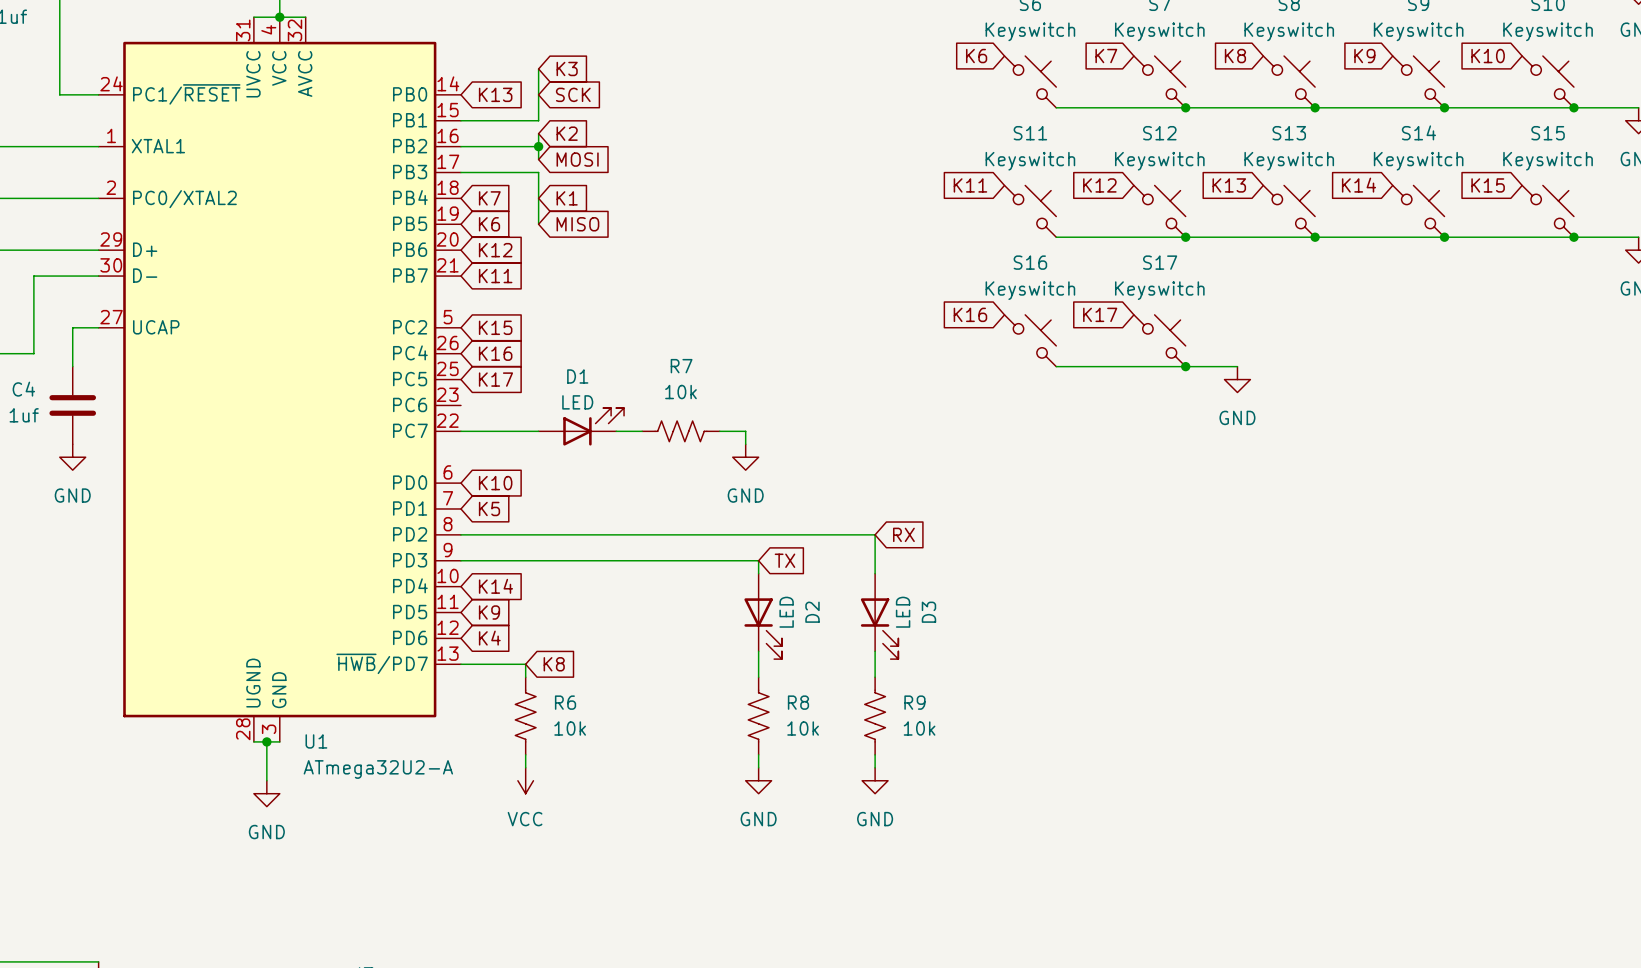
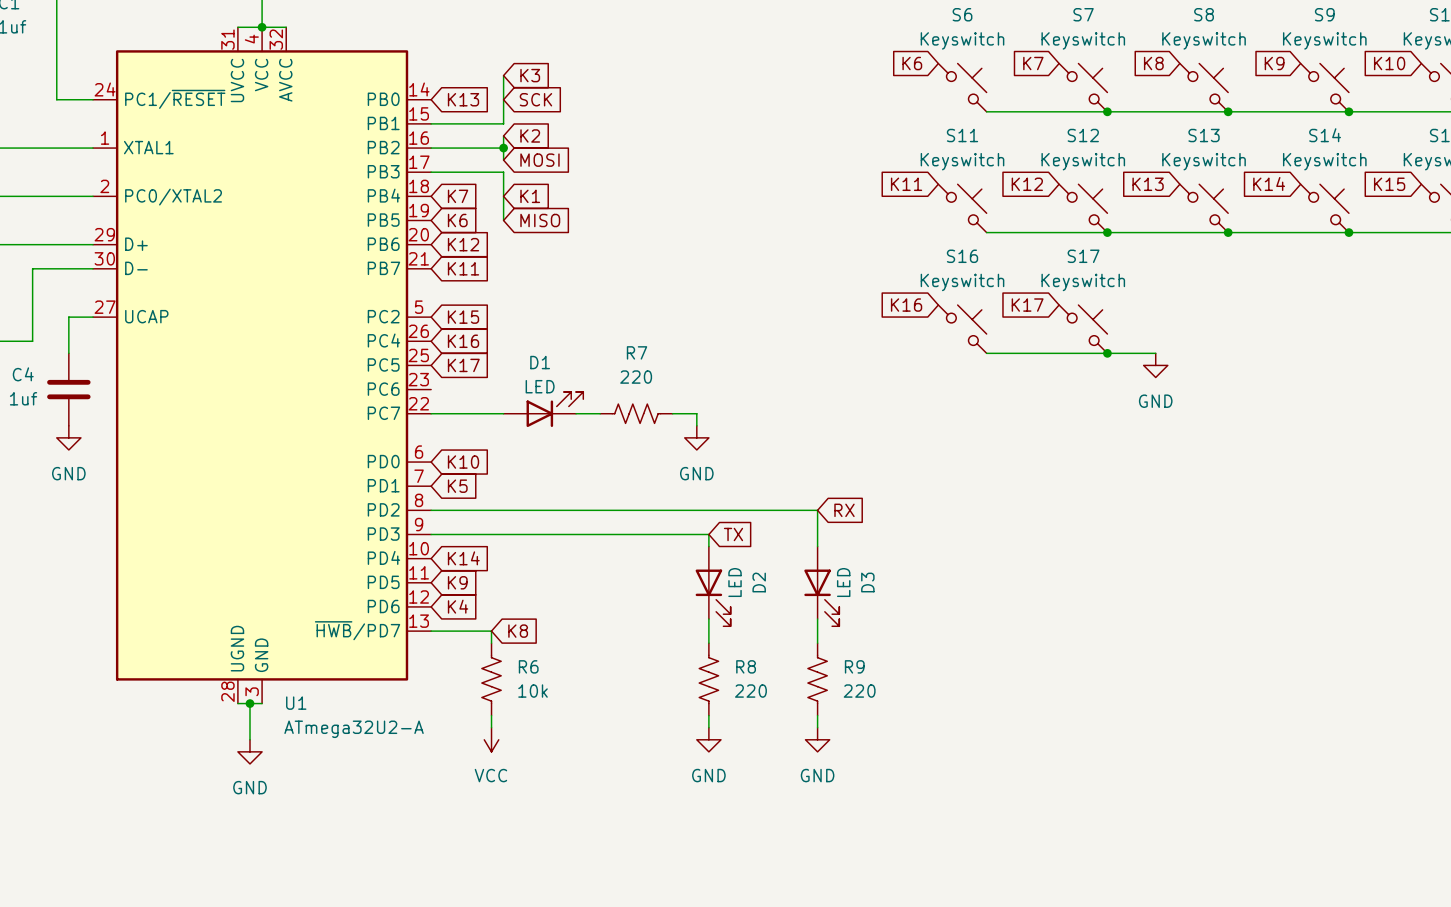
R7 value: 10k (680, 392) -> 220 (636, 377)
R8 value: 10k (803, 728) -> 220 (750, 691)
R9 value: 10k (919, 728) -> 220 (859, 691)

